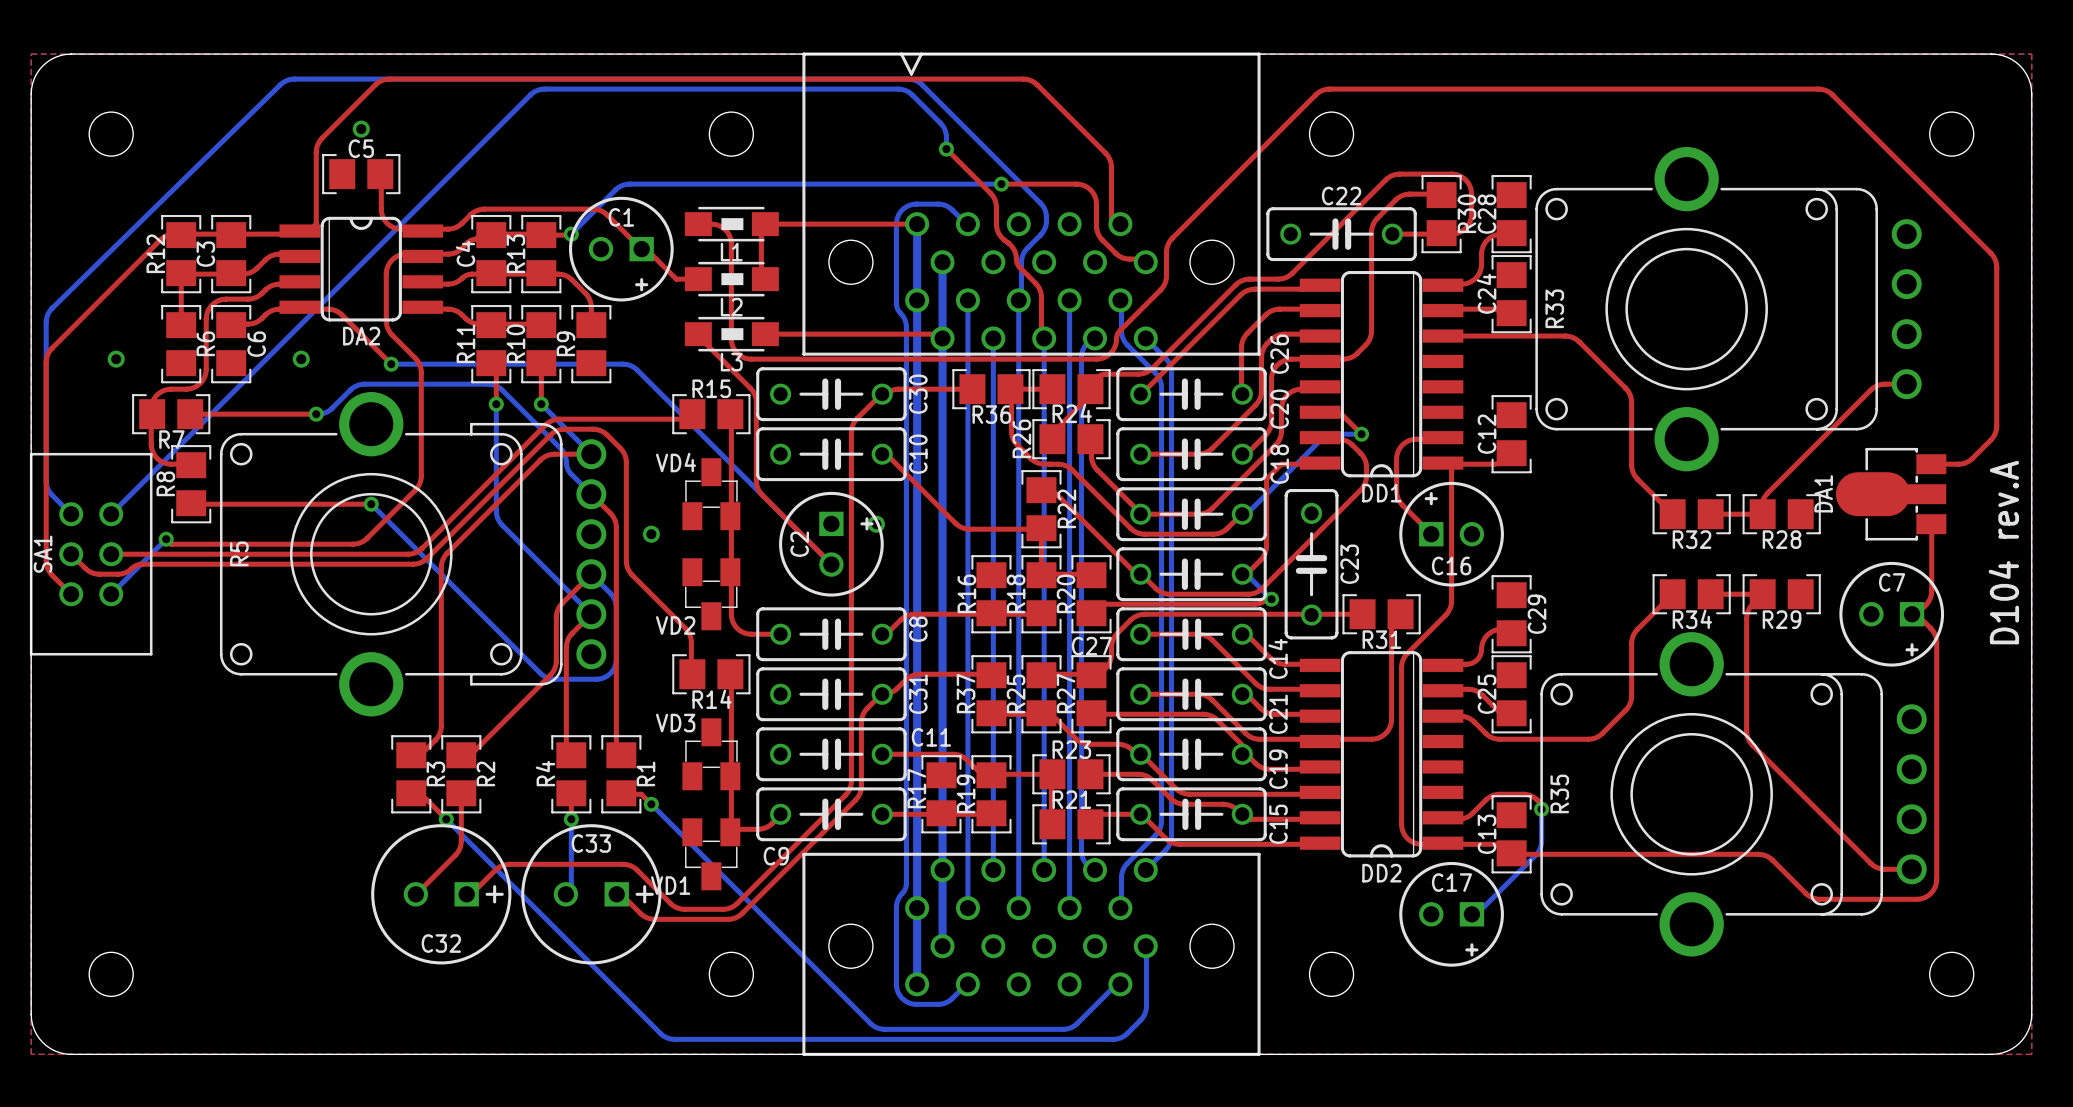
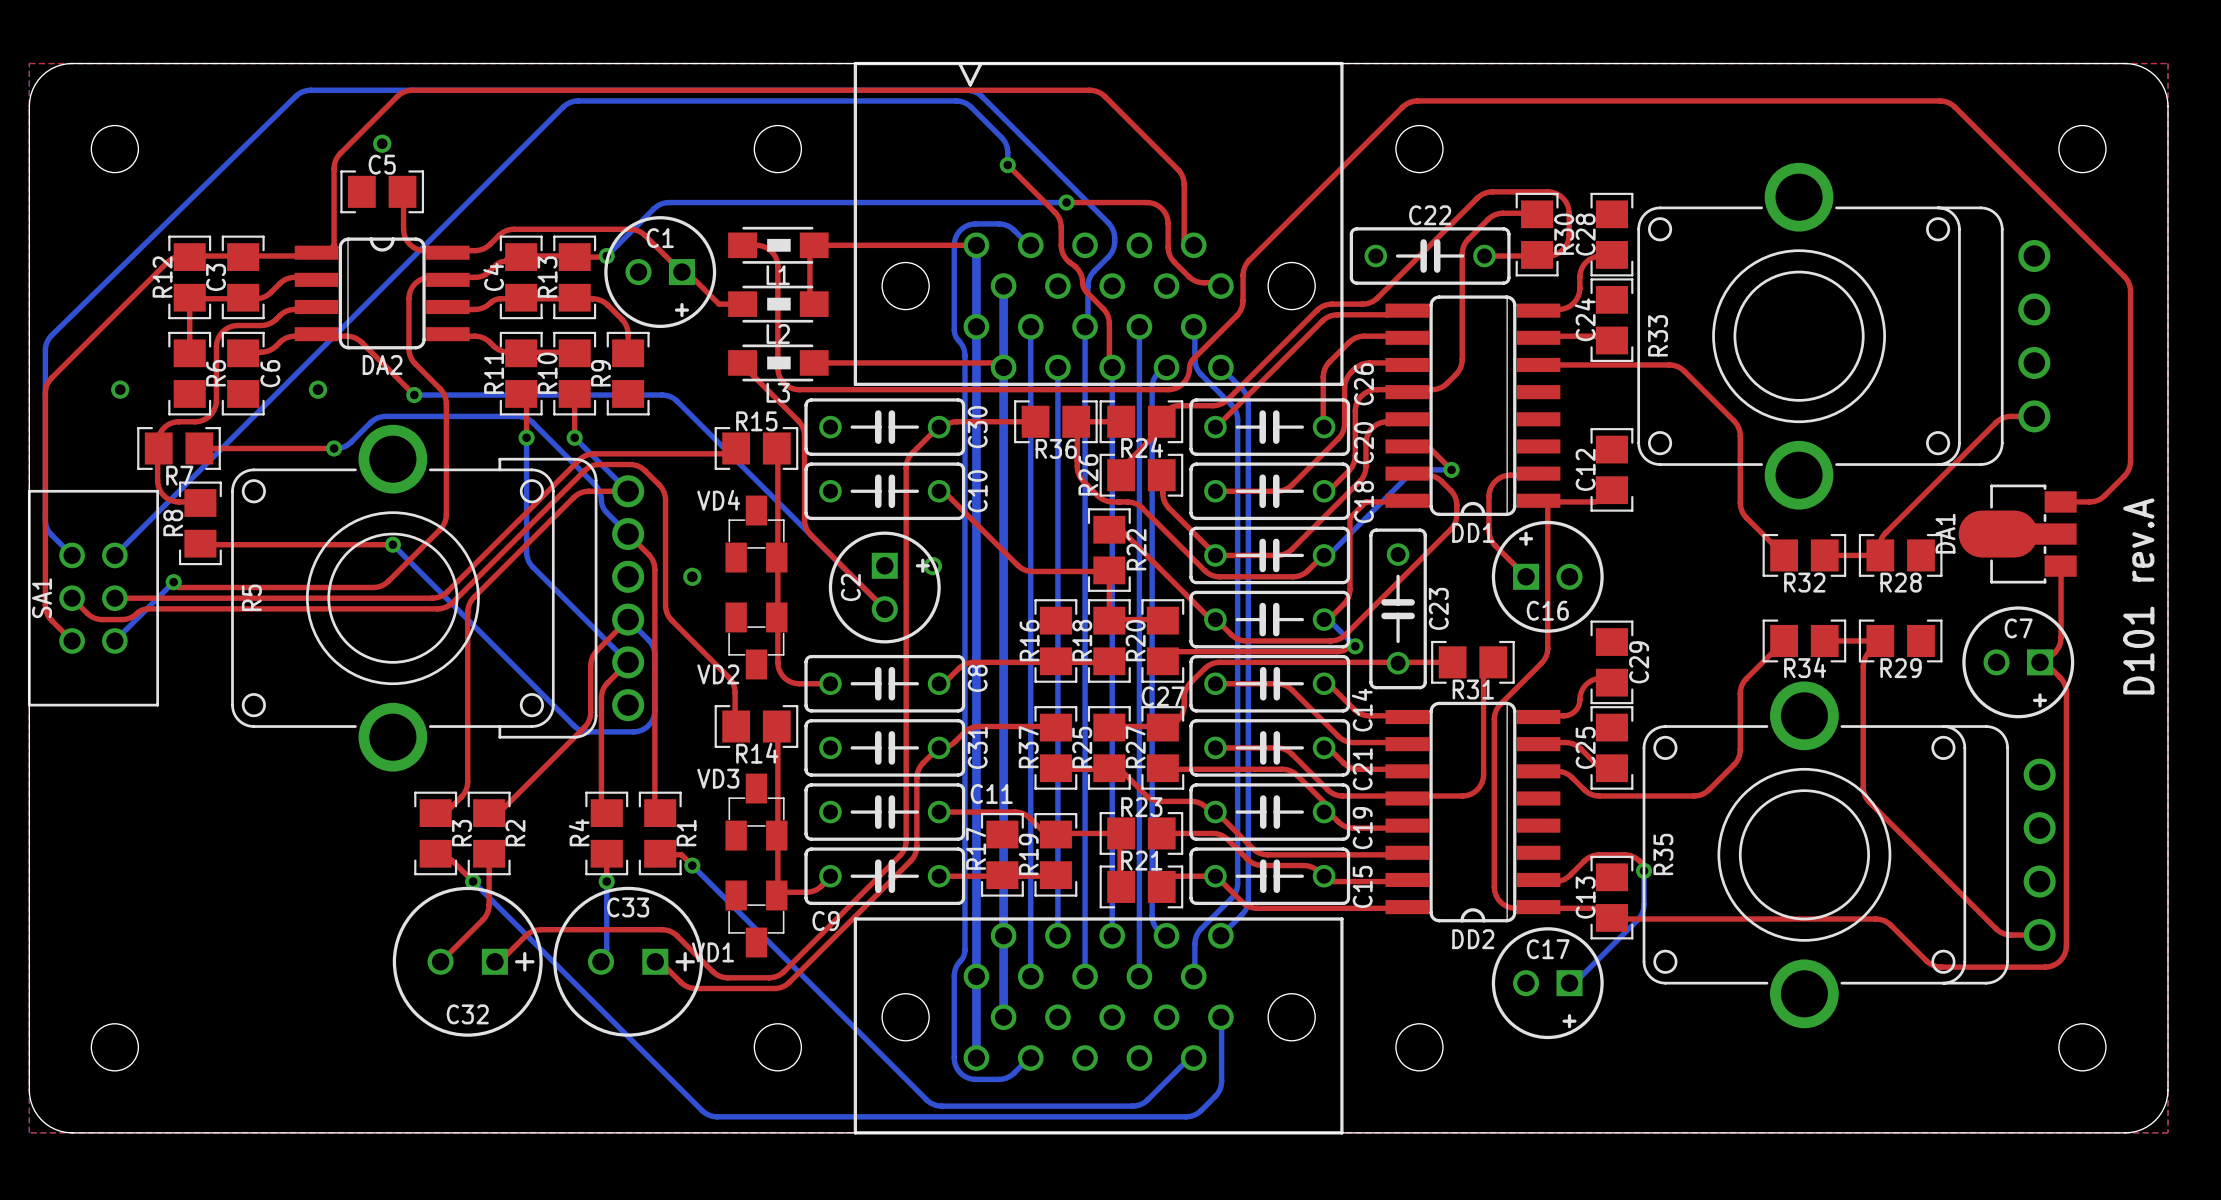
part value: D104 rev.A (2003, 552) -> D101 rev.A (2138, 596)

